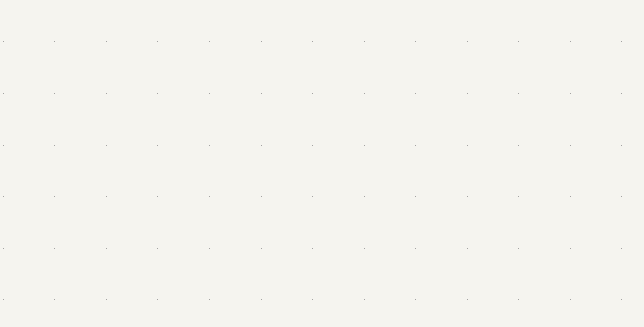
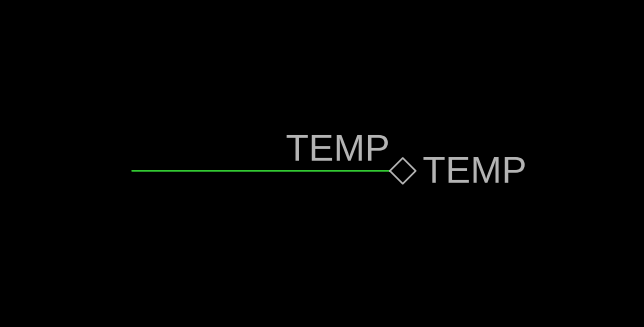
label: none -> TEMP (337, 147)
hierarchical label: none -> TEMP (474, 169)
wire: none -> (132, 170) (389, 170)

